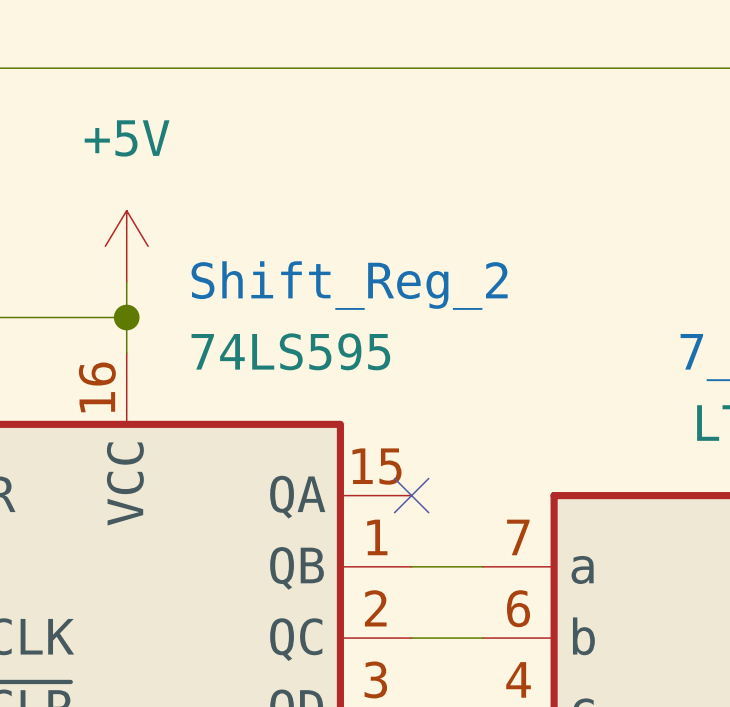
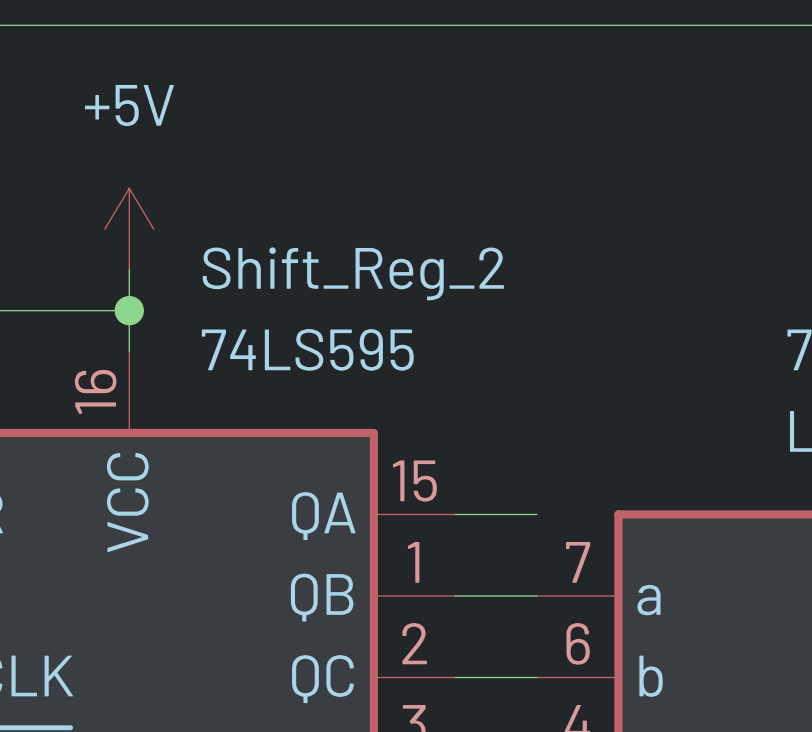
wire: none -> (455, 514) (536, 514)
no-connect mark: (411, 495) -> none

